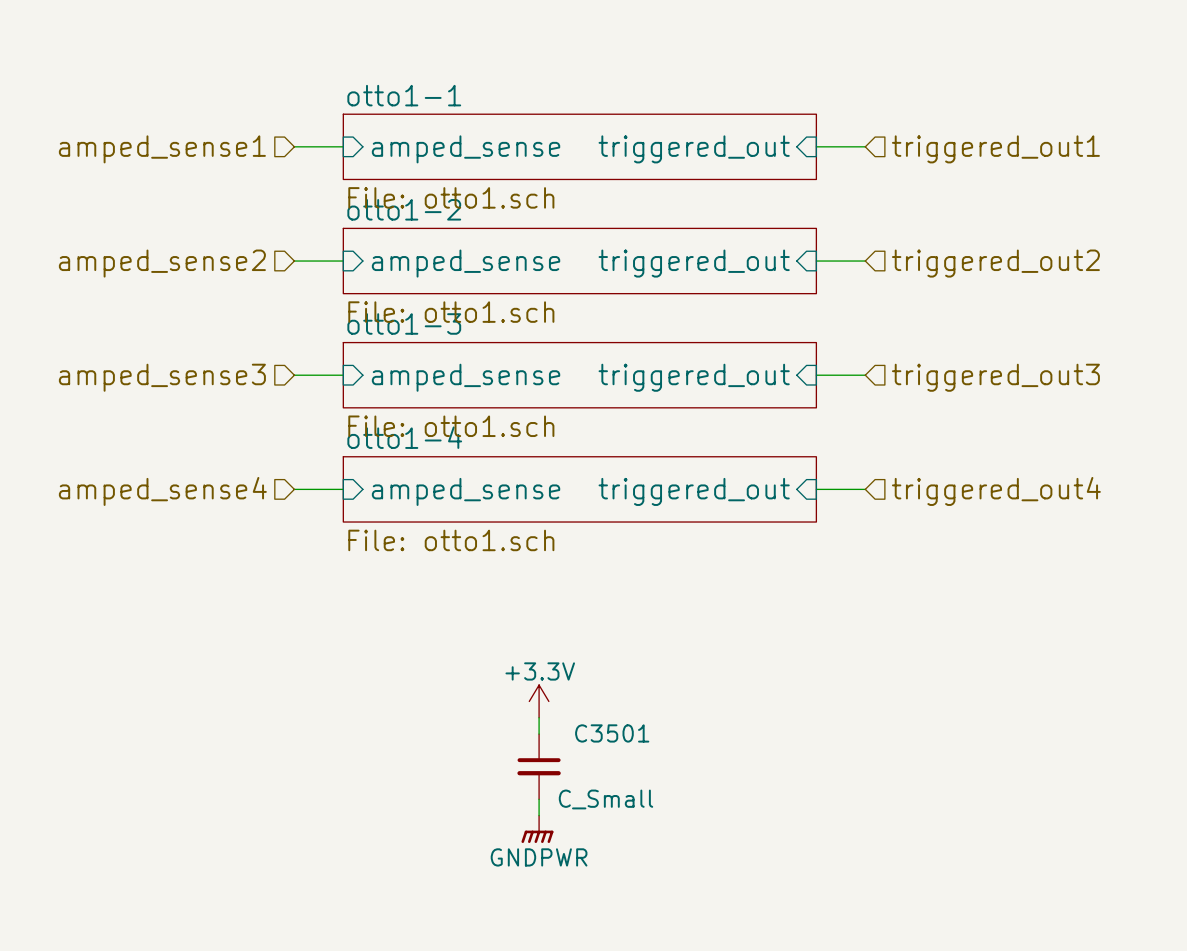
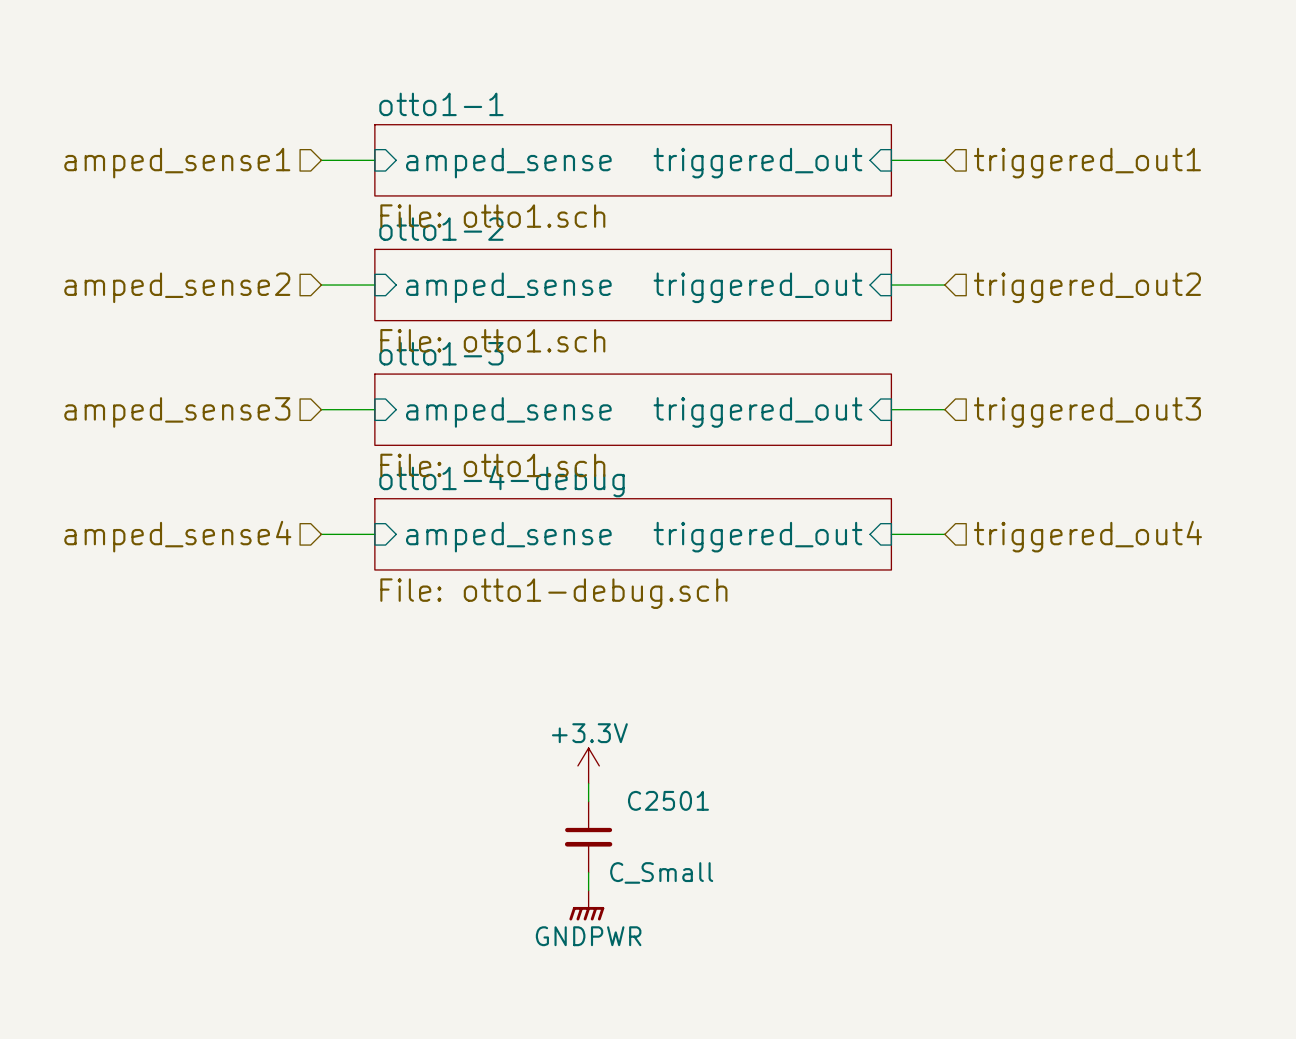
sheet otto1-4 name: otto1-4 (404, 437) -> otto1-4-debug (501, 481)
sheet otto1-4 value: File: otto1.sch (451, 540) -> File: otto1-debug.sch (553, 593)
C3501 name: C3501 (612, 733) -> C2501 (668, 800)

